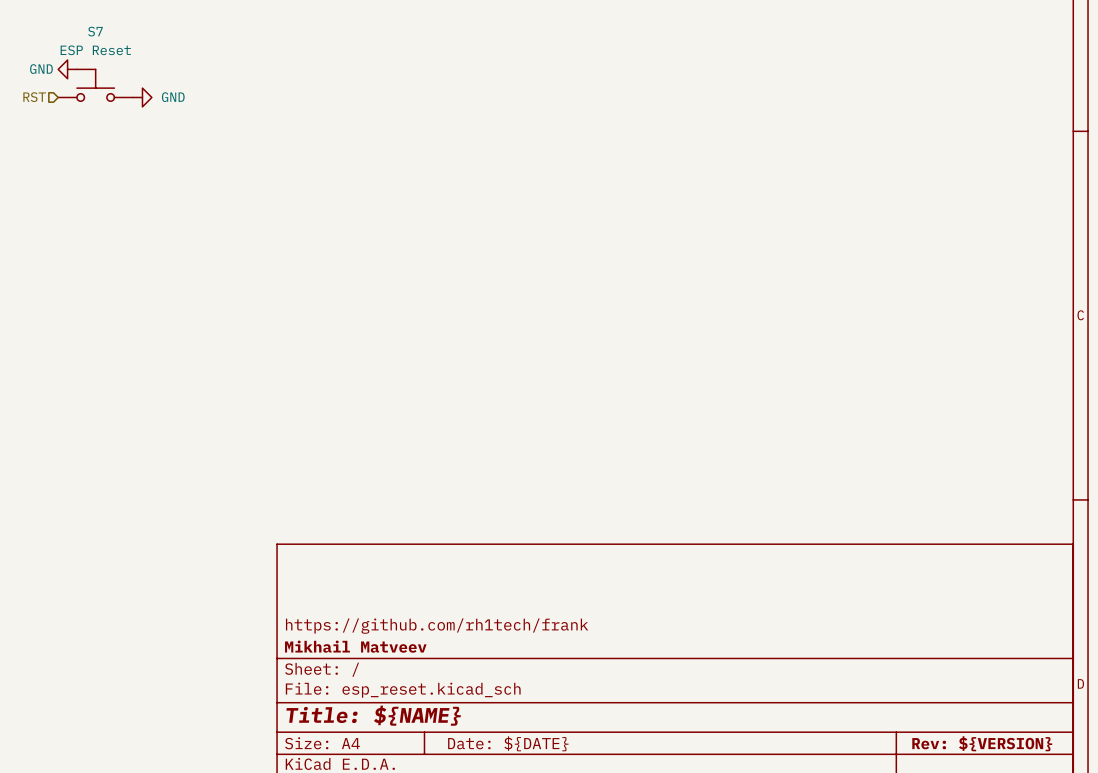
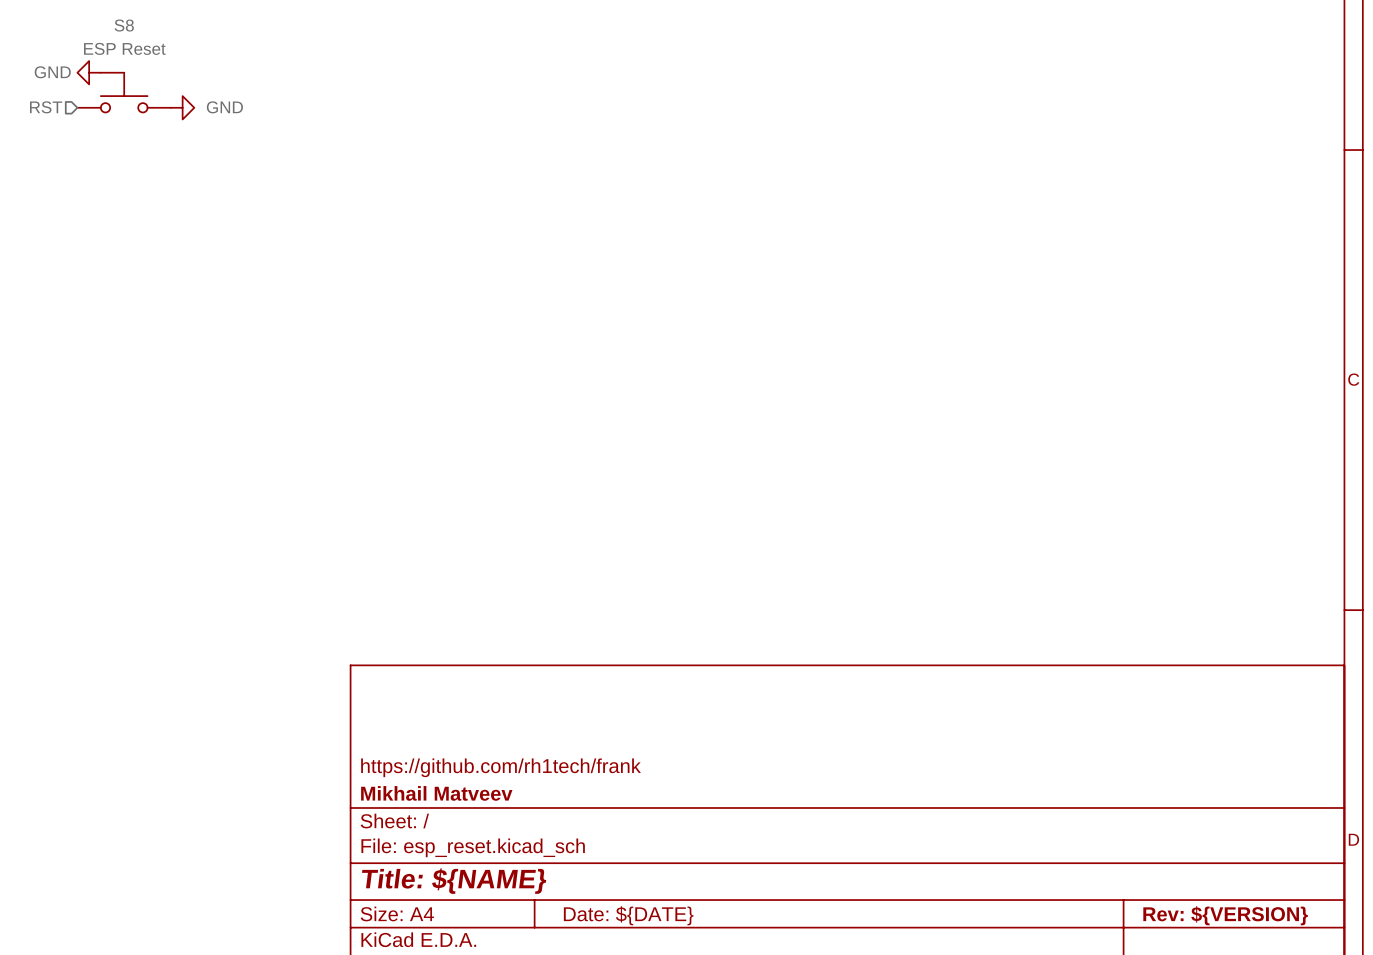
S7 name: S7 (95, 31) -> S8 (124, 25)

